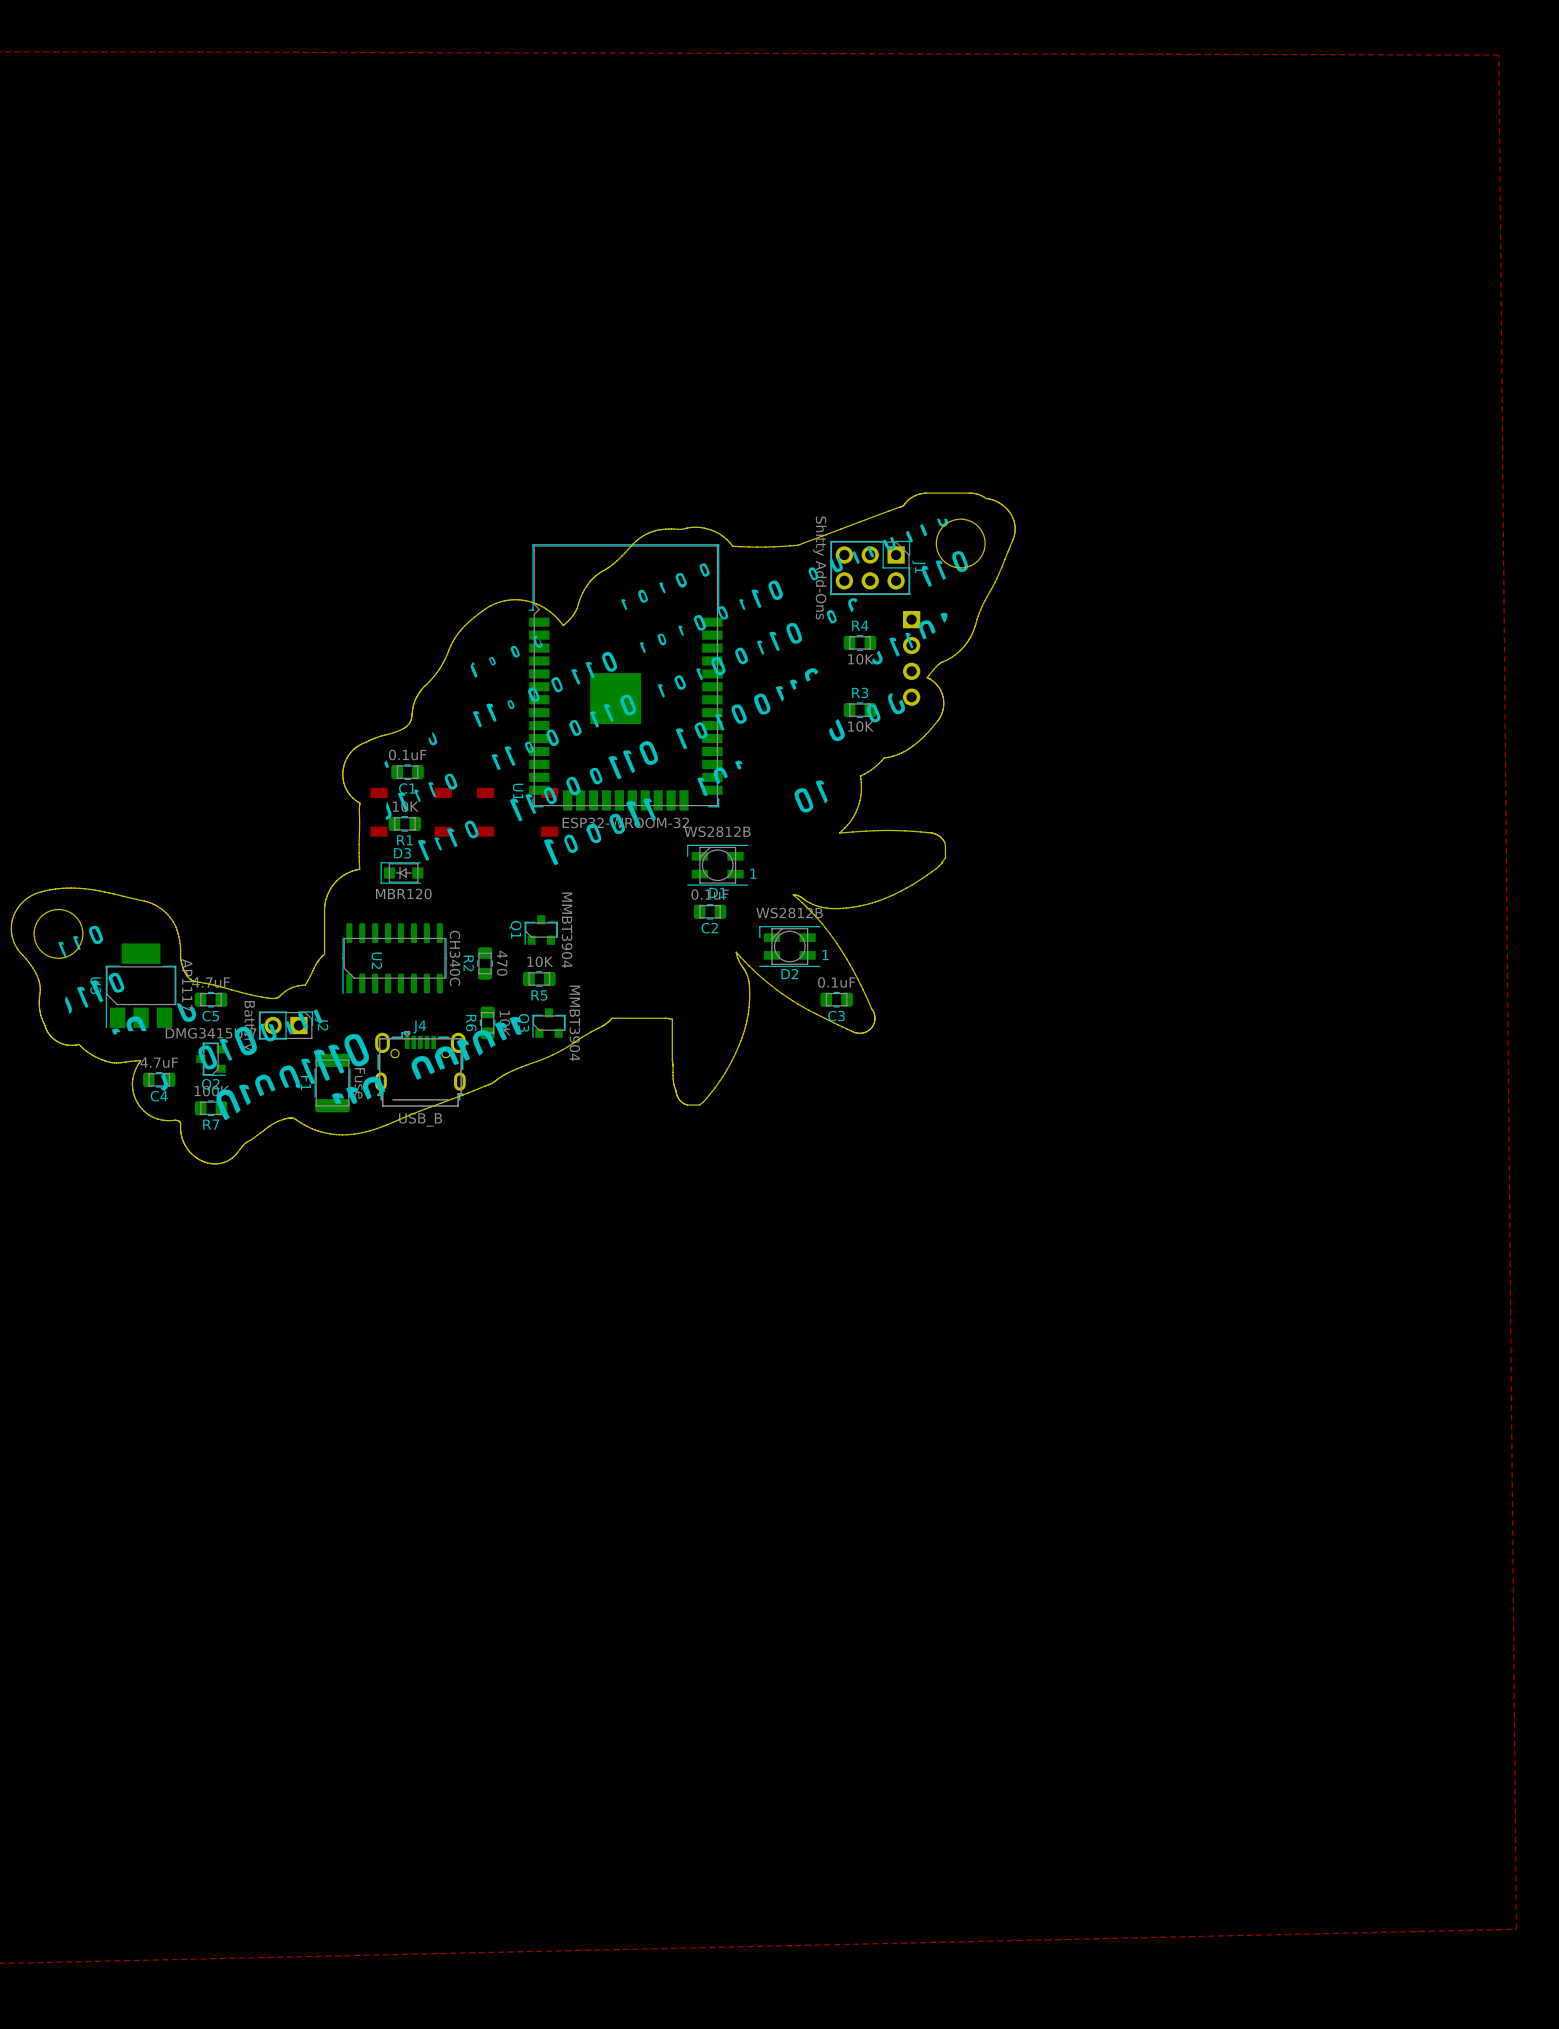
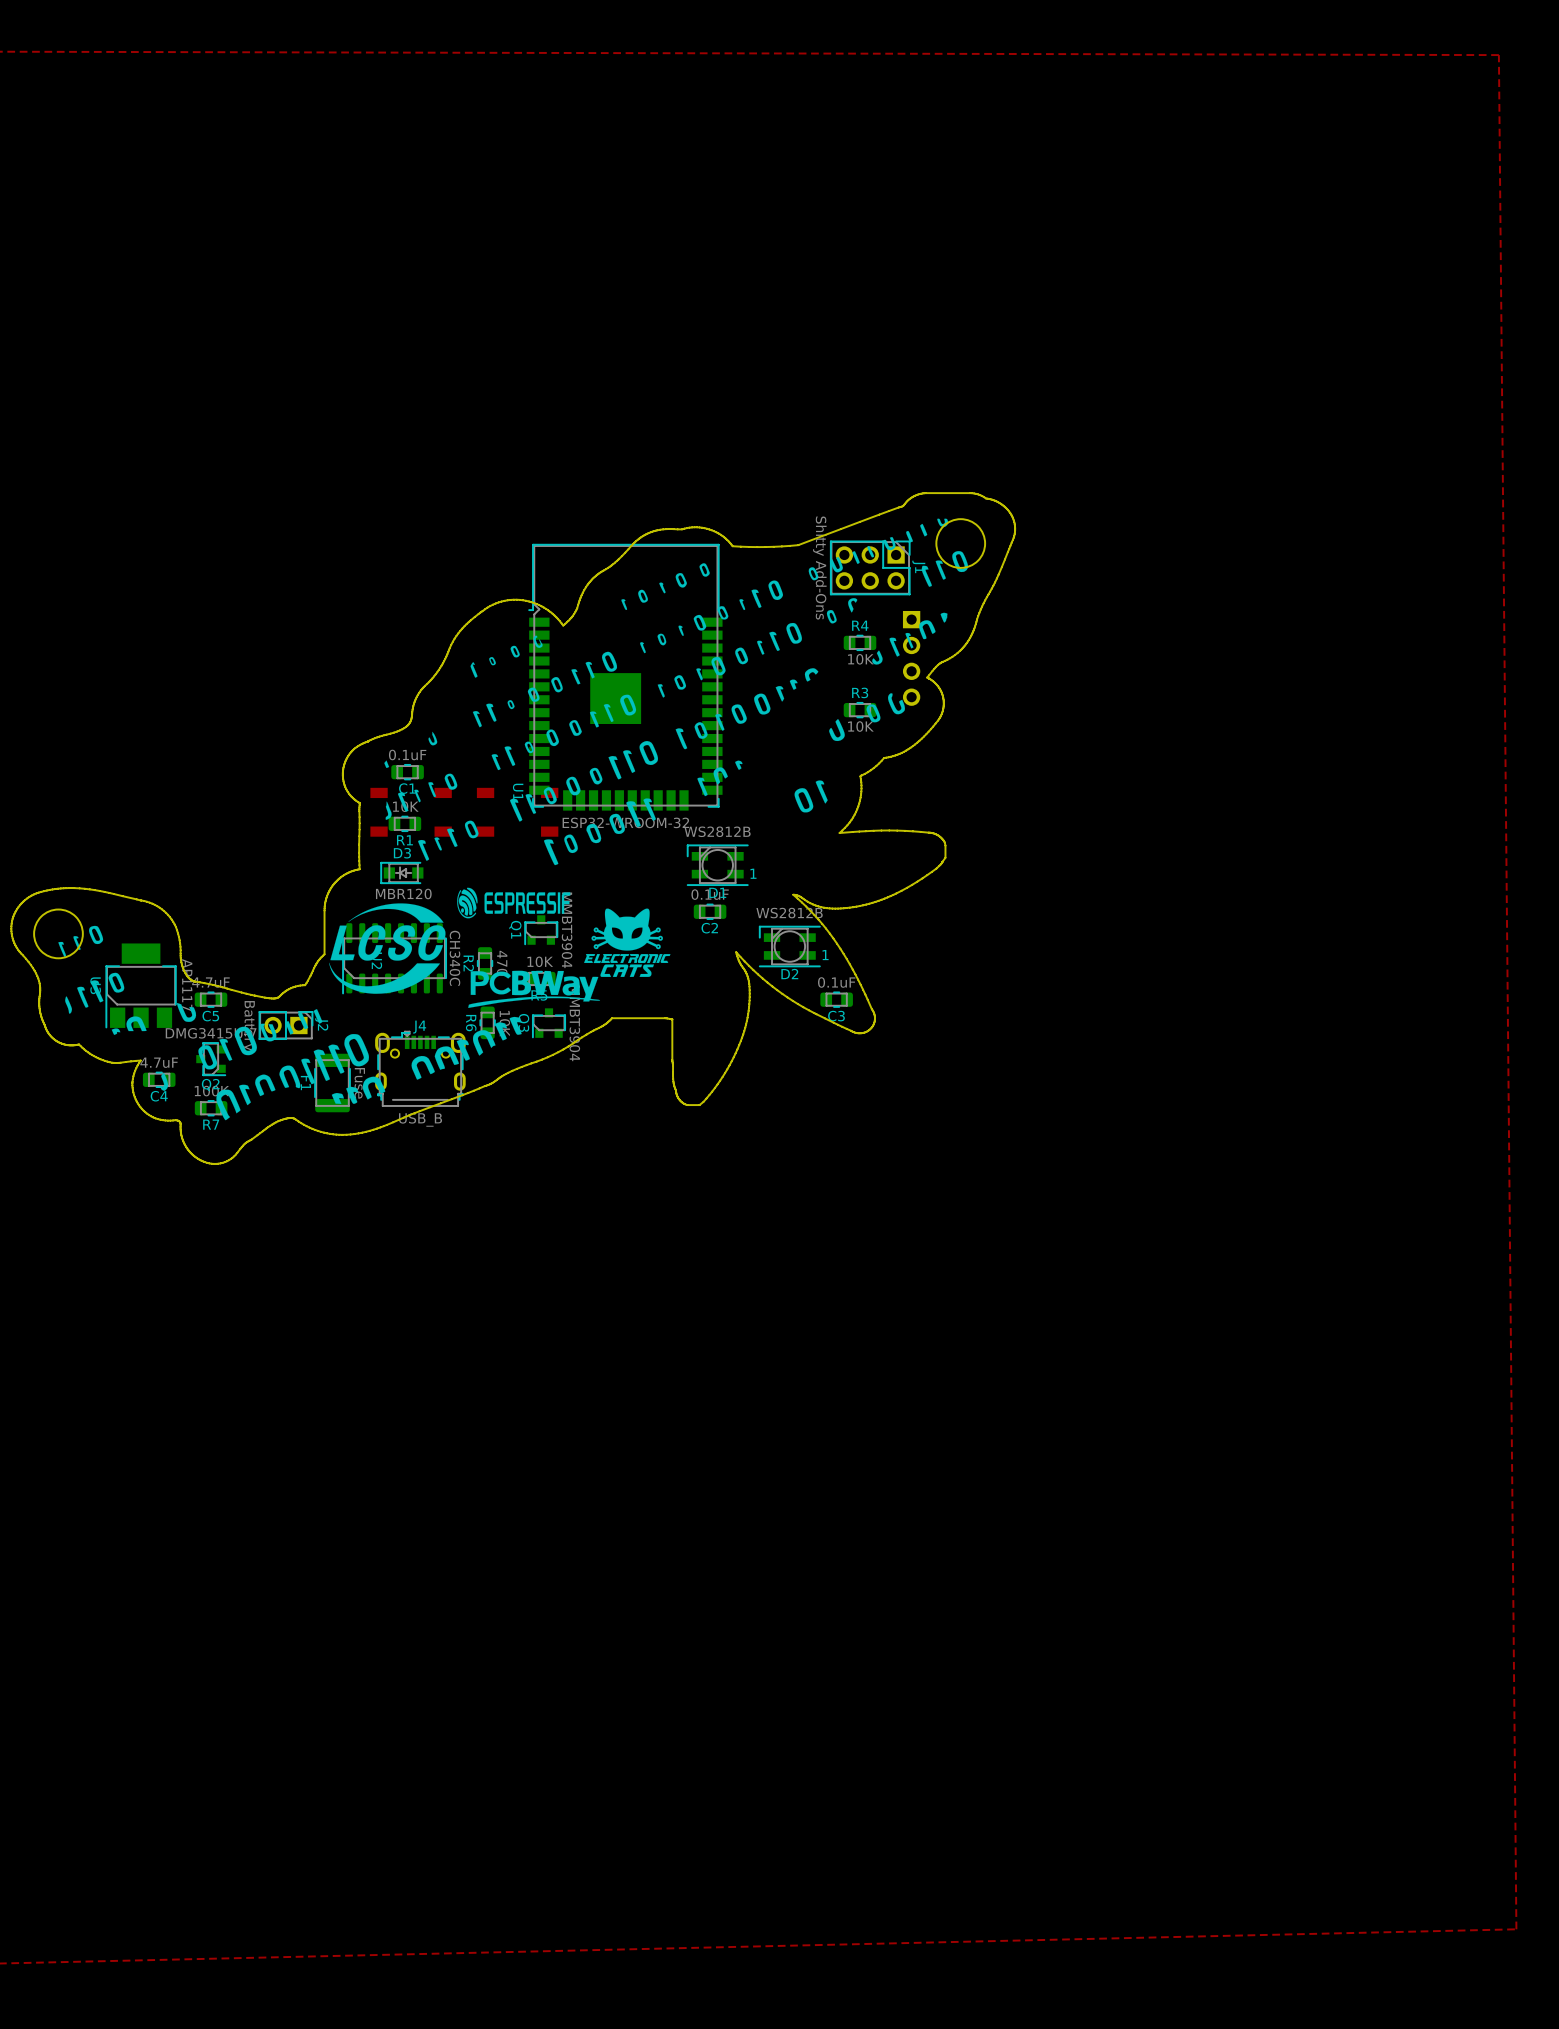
drawing: none -> [329, 887, 571, 994]
drawing: none -> [468, 908, 671, 1008]

